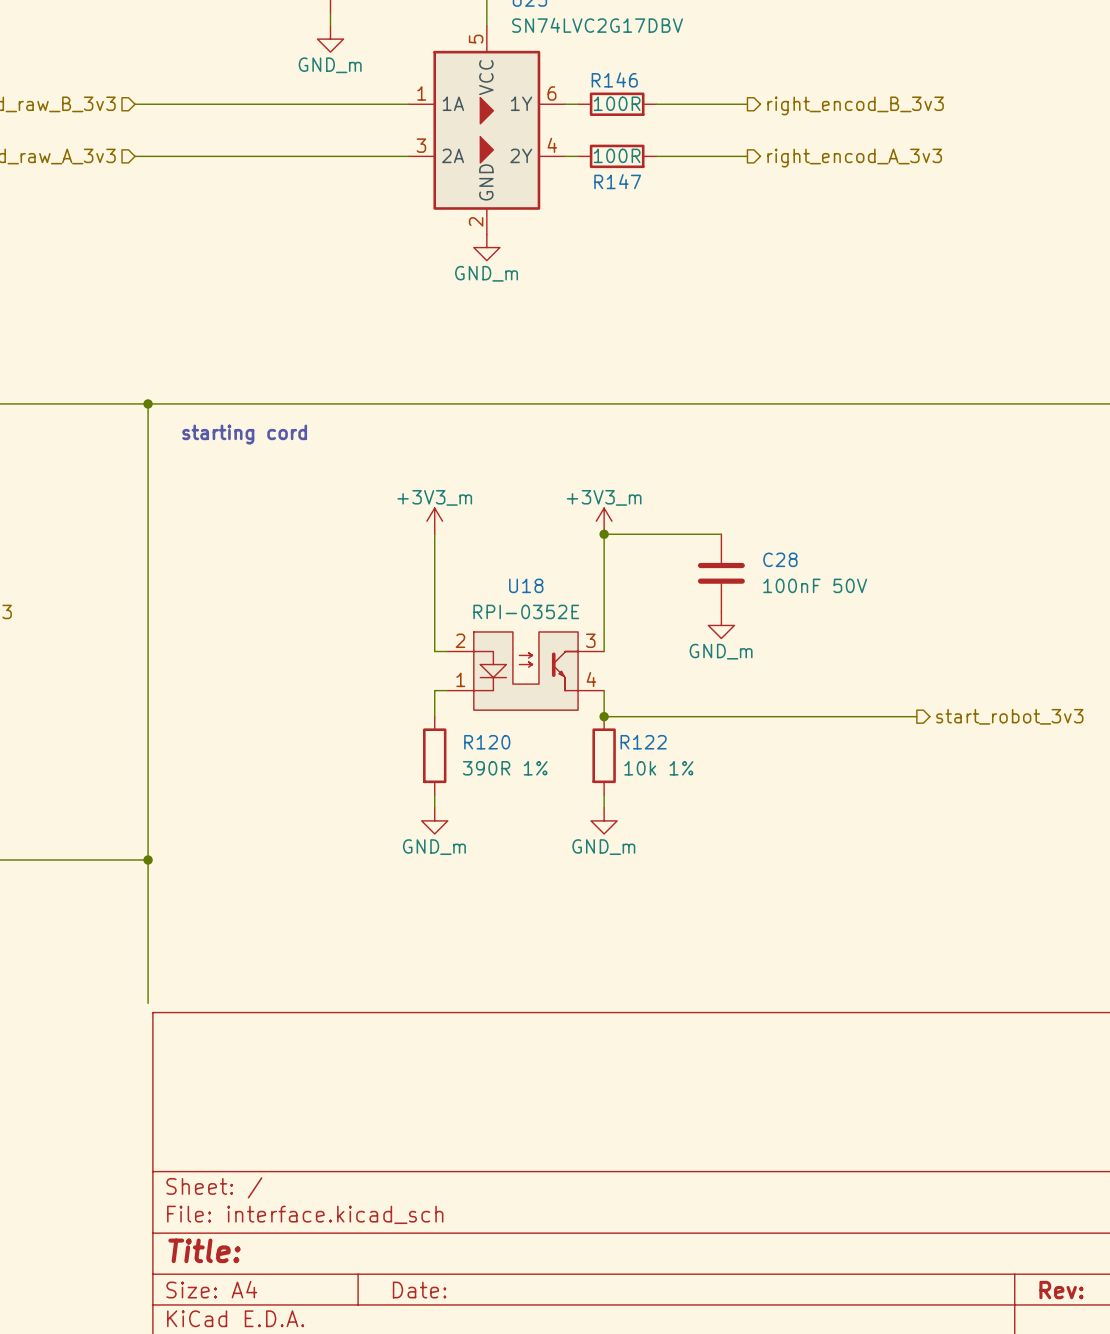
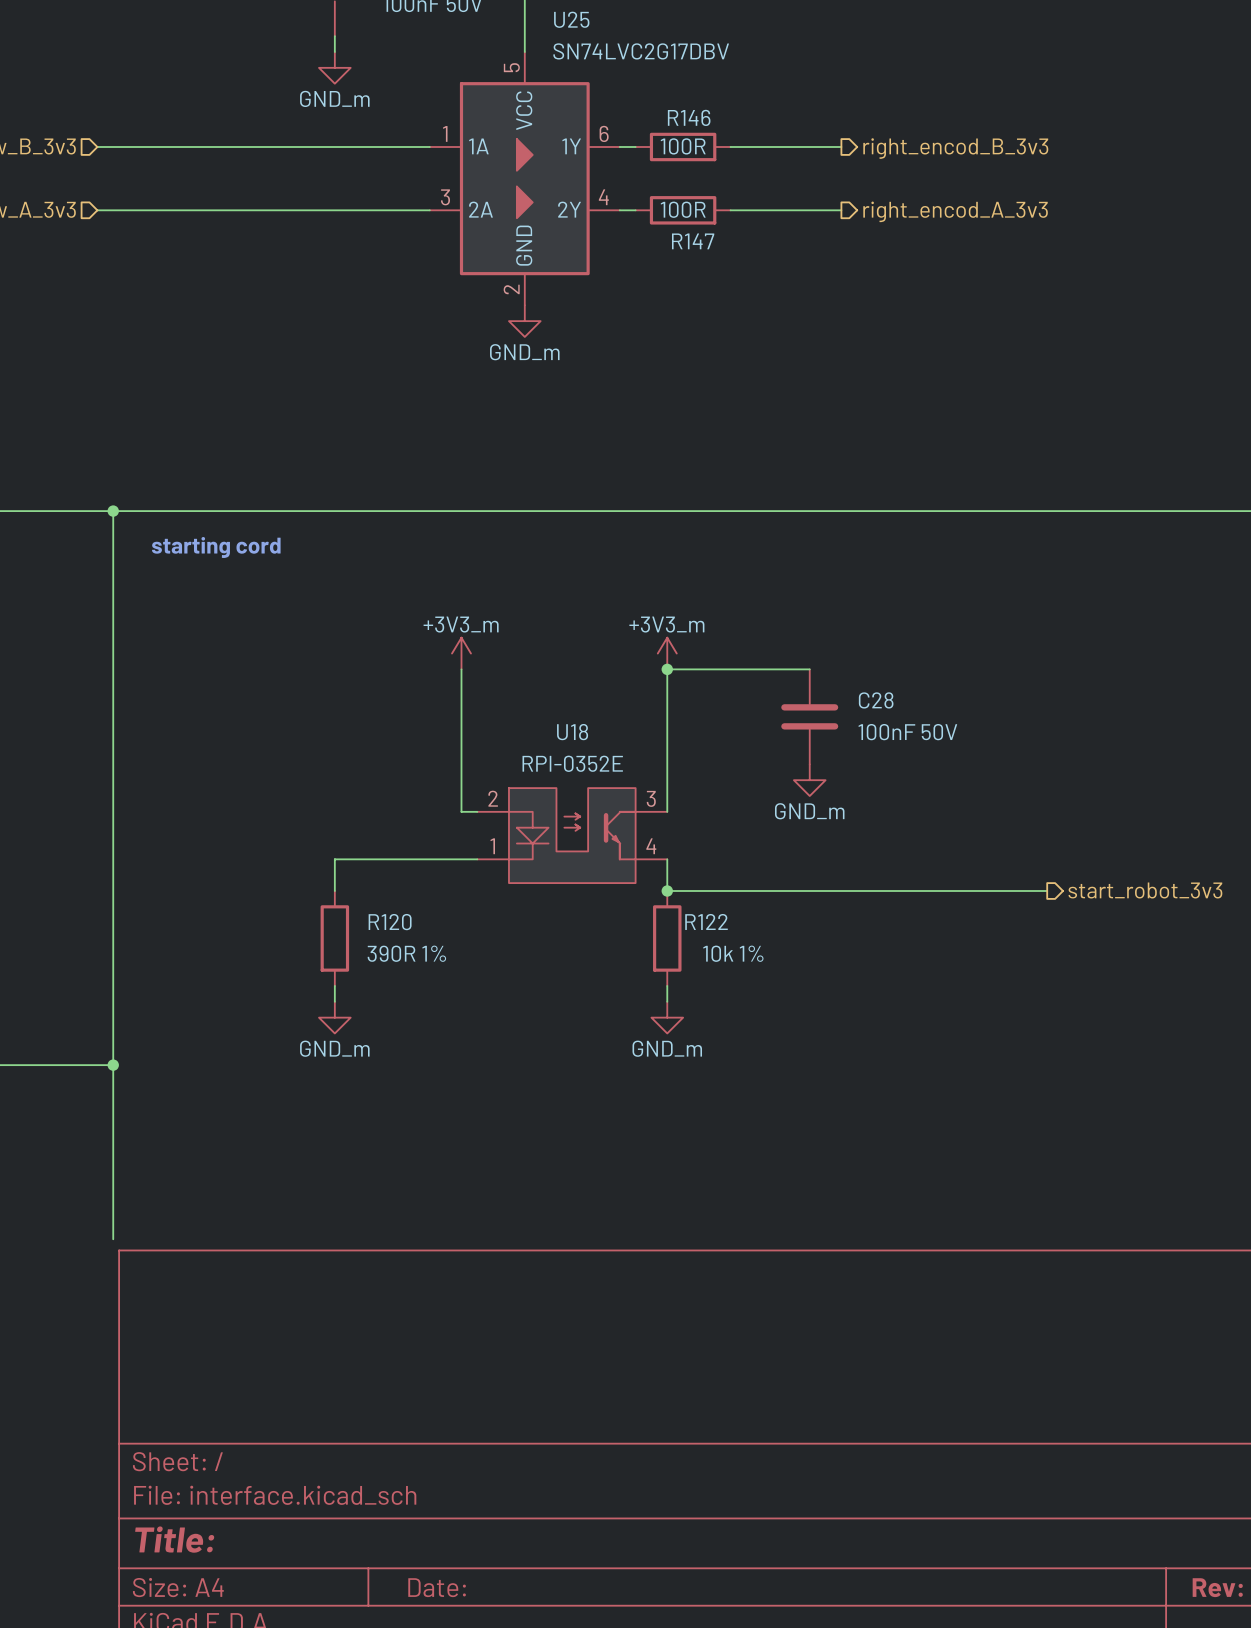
wire: (434, 690) (434, 716) -> (461, 859) (334, 859) (334, 890)
R120 position: (434, 755) -> (334, 938)
wire: (434, 794) (434, 807) -> (334, 985) (334, 1001)
power symbol position: GND_m (434, 820) -> GND_m (334, 1017)

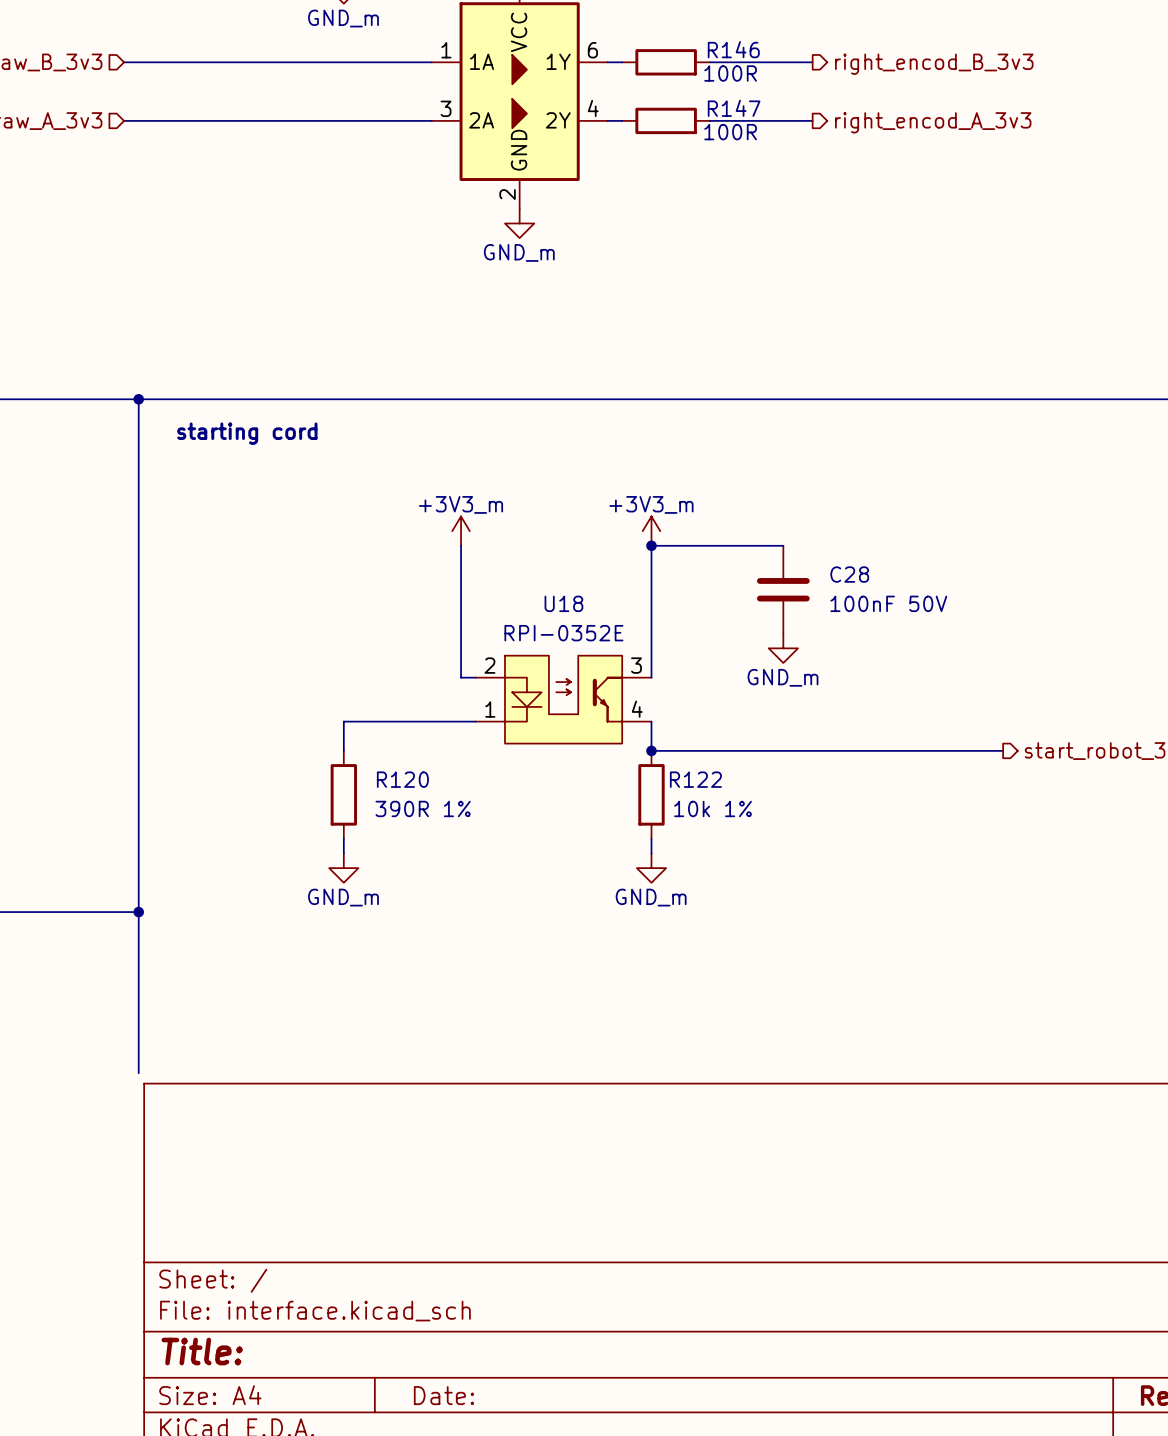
R146 name position: R146 (689, 117) -> R146 (733, 49)
R146 value position: 100R (683, 146) -> 100R (730, 73)
R147 value position: 100R (683, 209) -> 100R (730, 132)
R147 name position: R147 (693, 241) -> R147 (734, 108)

